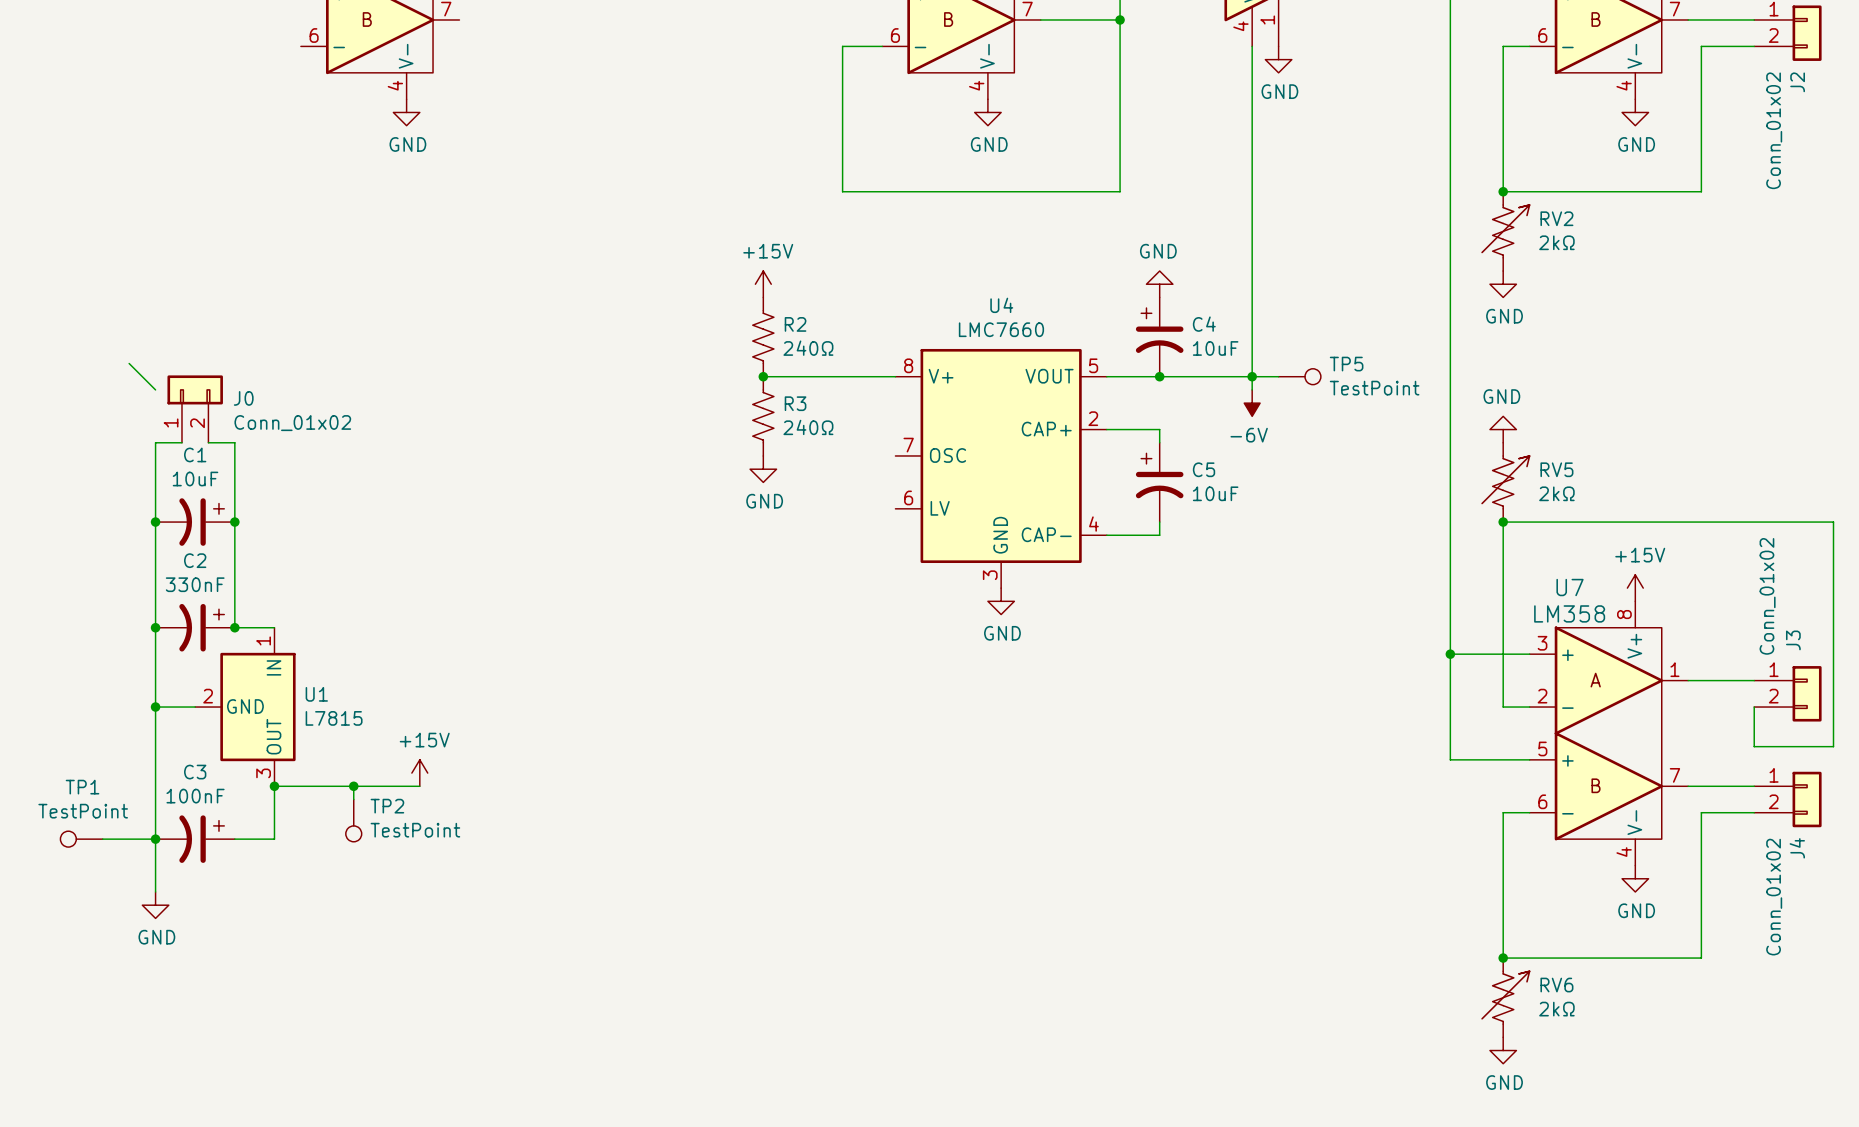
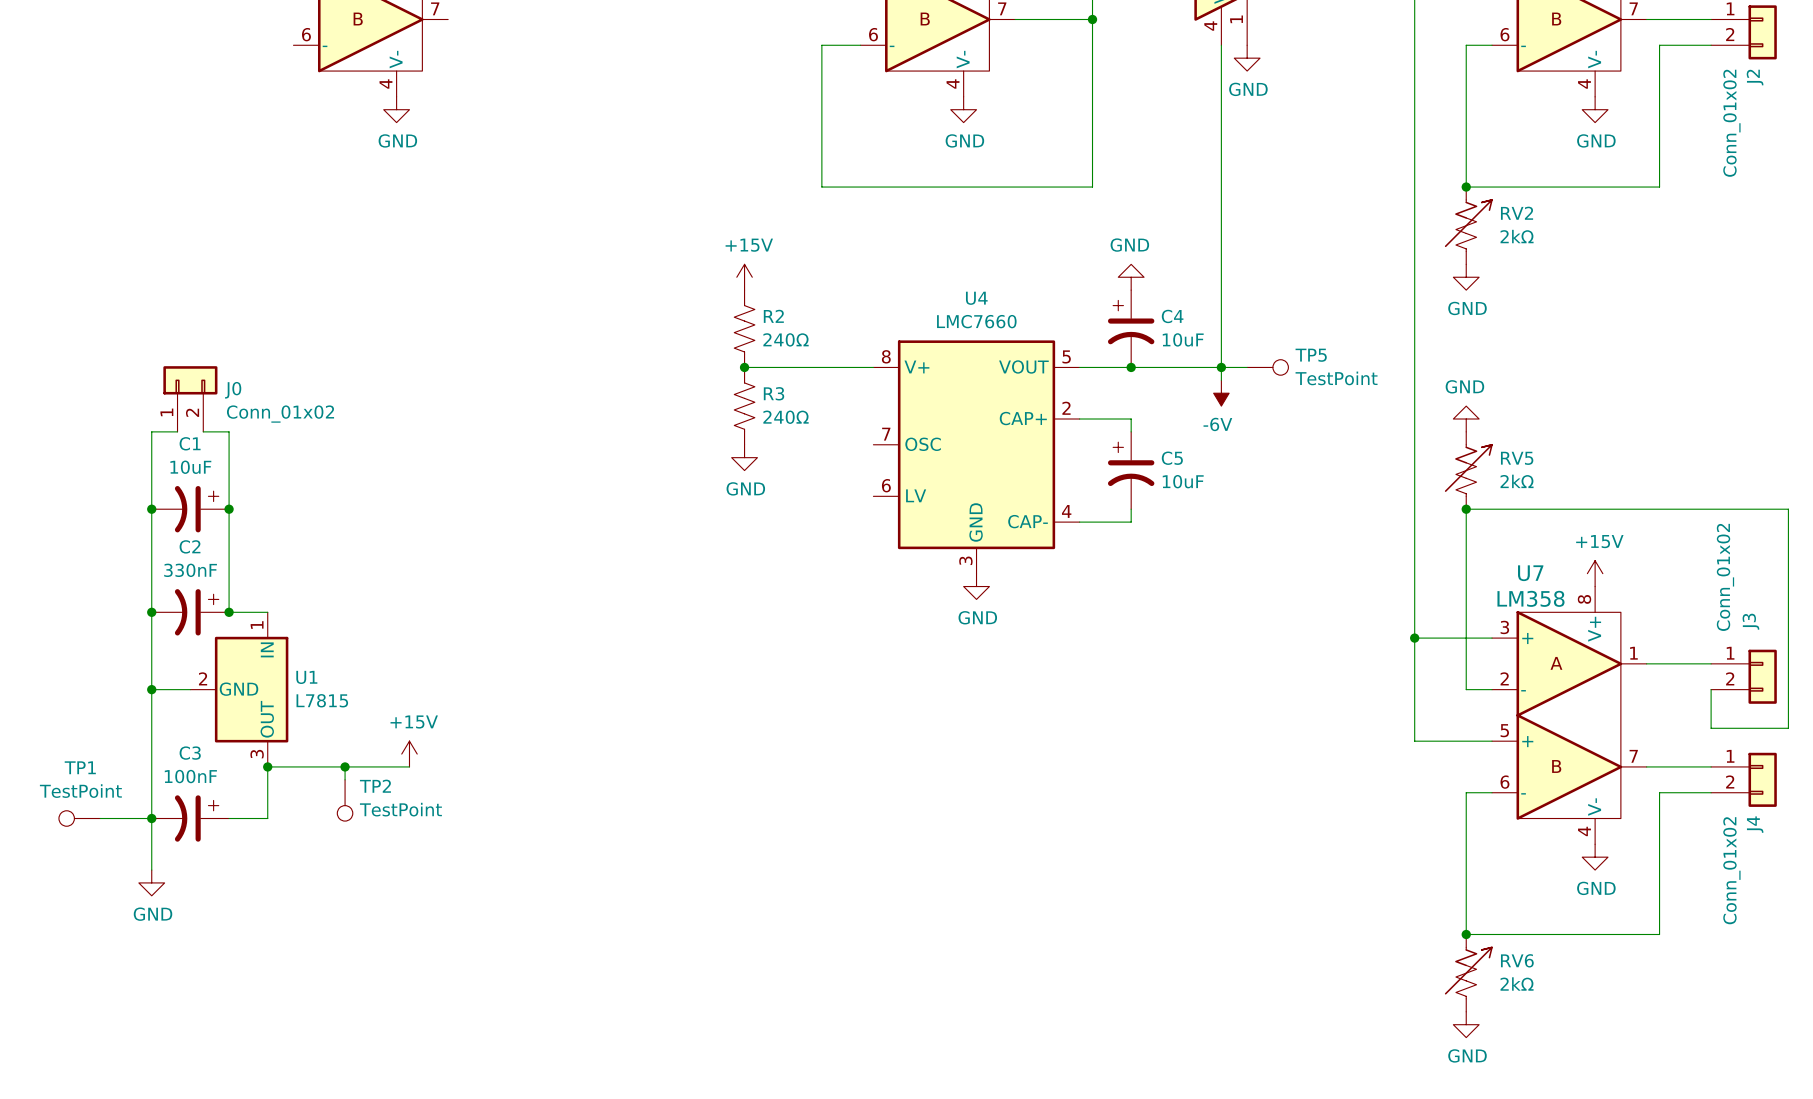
wire: (129, 363) (155, 389) -> none

